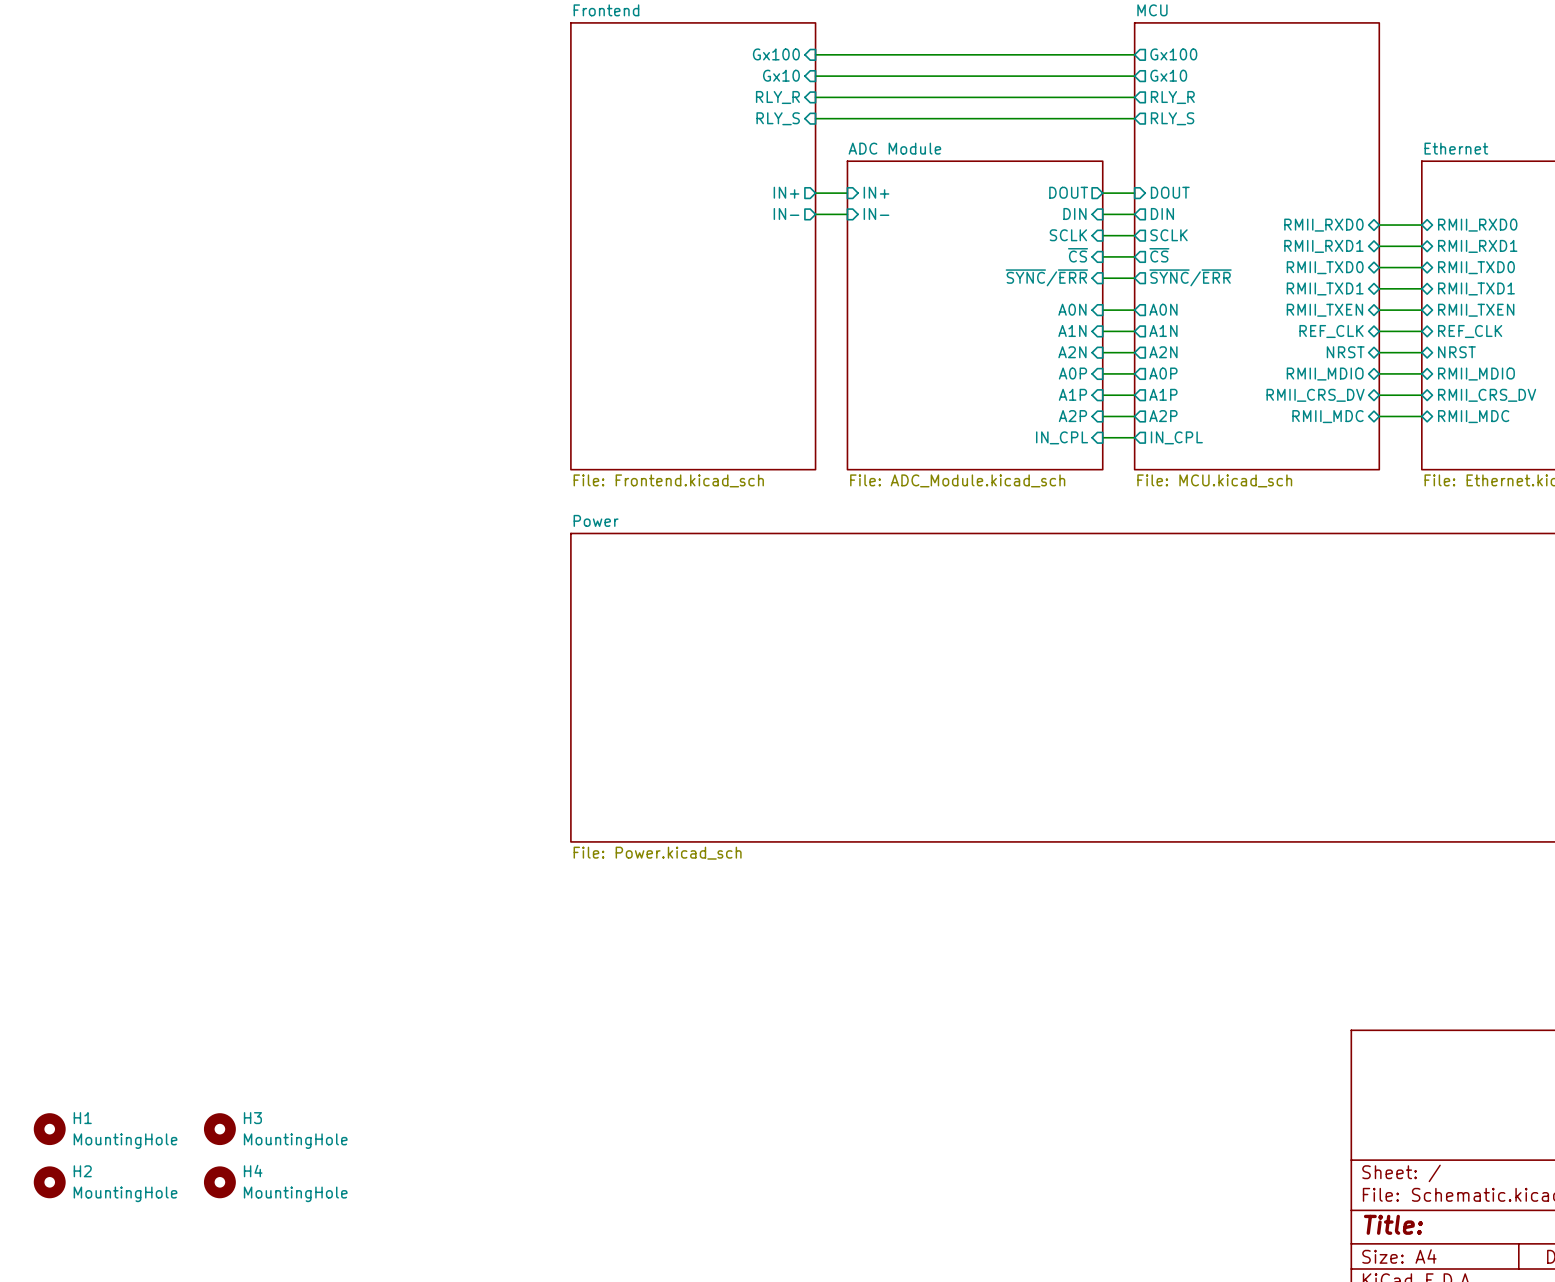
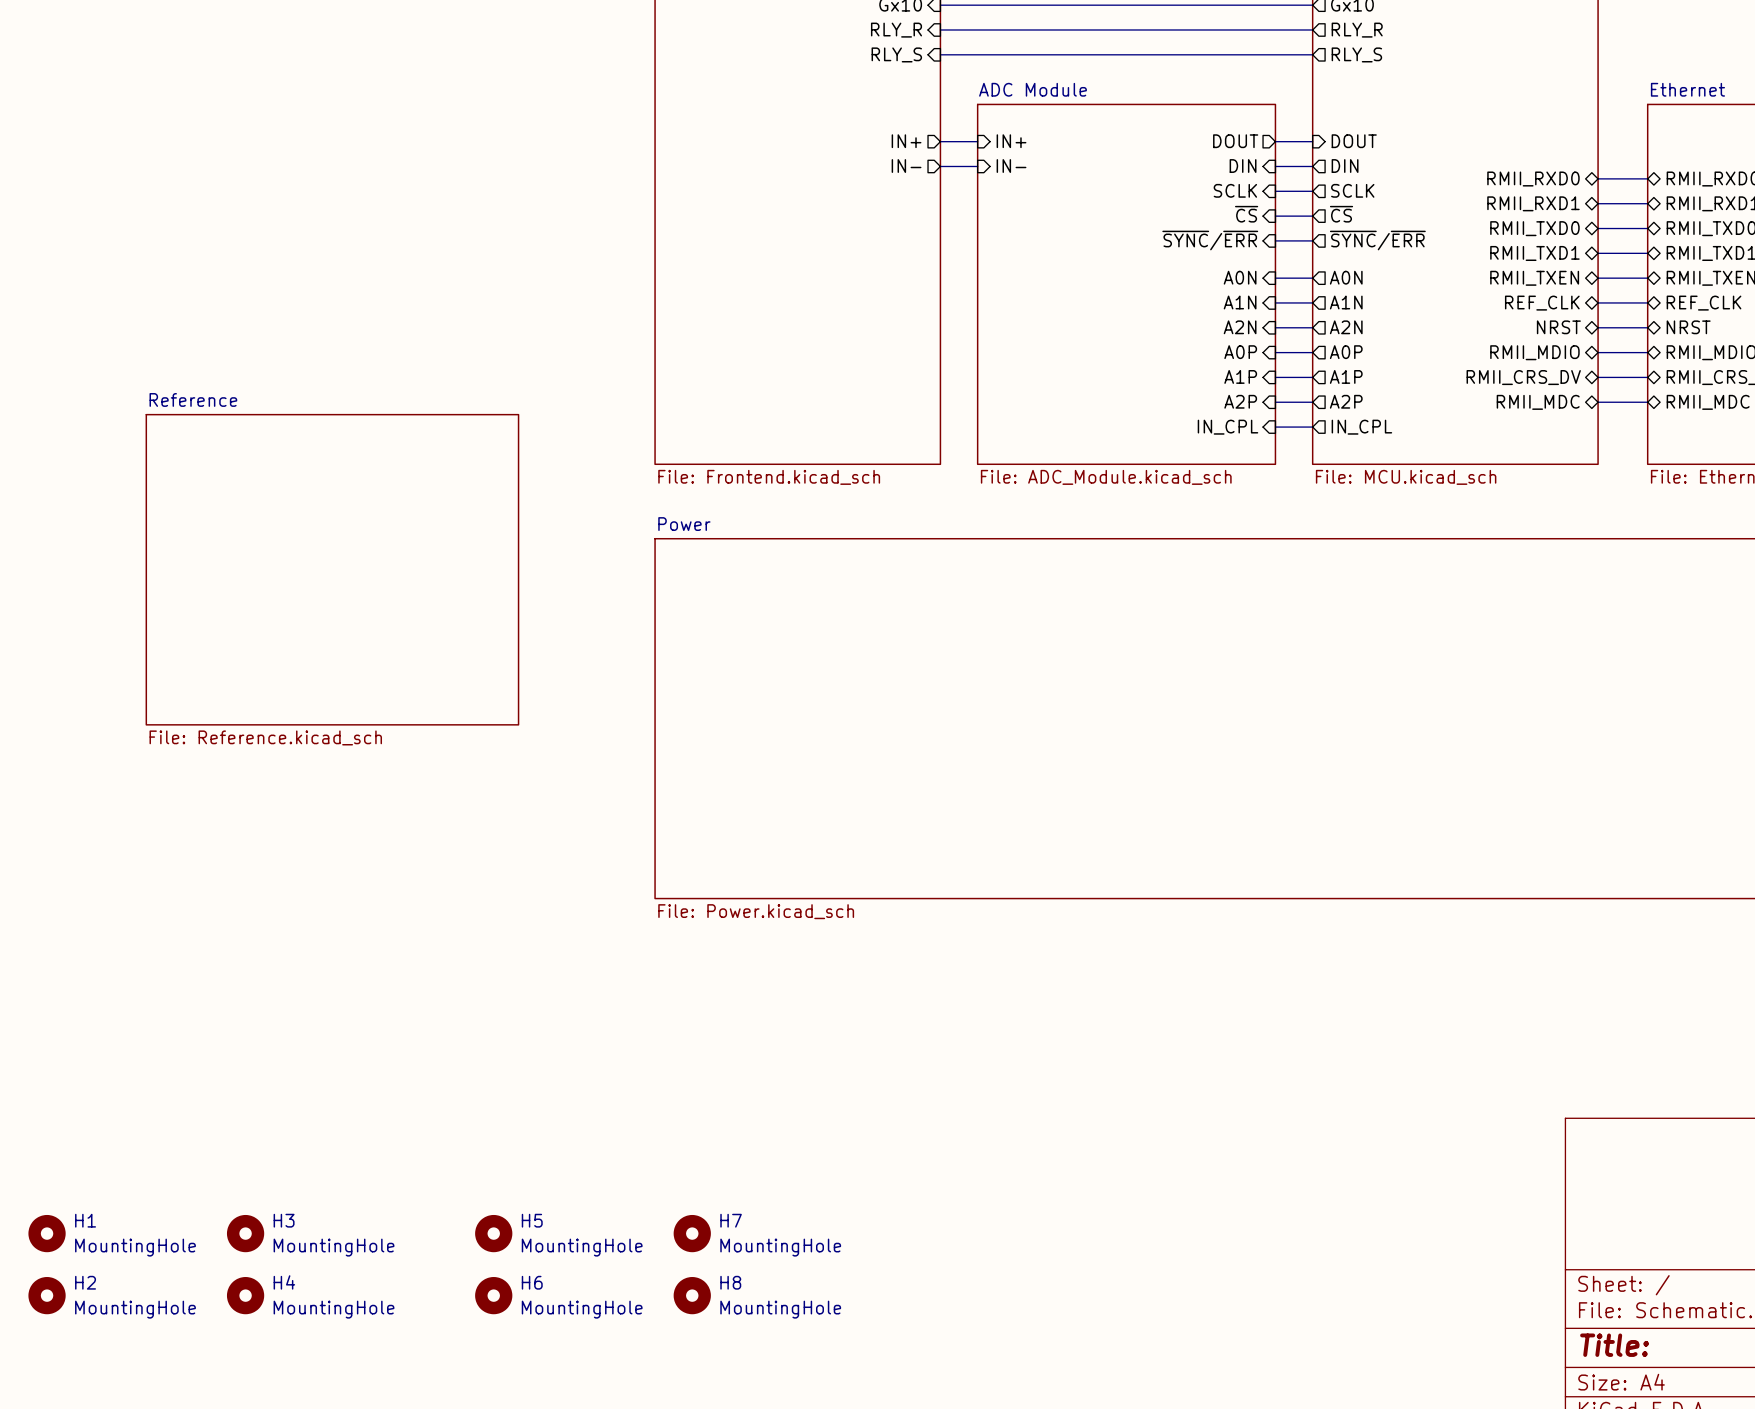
sheet Reference: none -> File: Reference.kicad_sch (332, 569)
H5: none -> MountingHole (493, 1233)
H7: none -> MountingHole (692, 1233)
H6: none -> MountingHole (493, 1295)
H8: none -> MountingHole (692, 1295)

